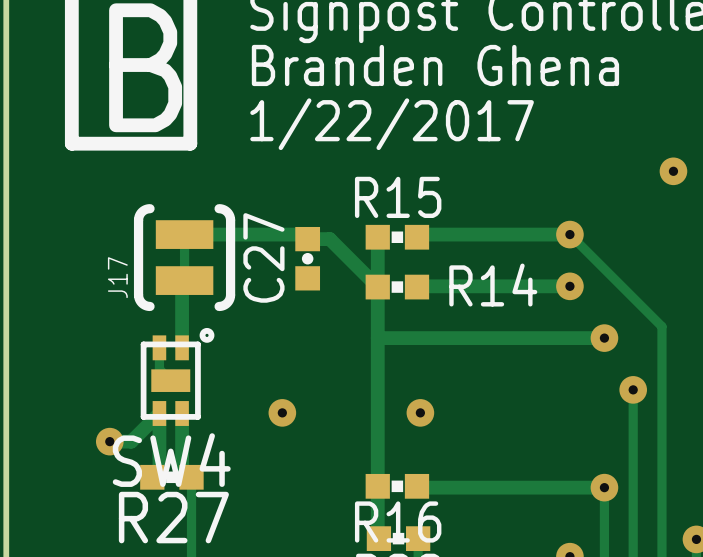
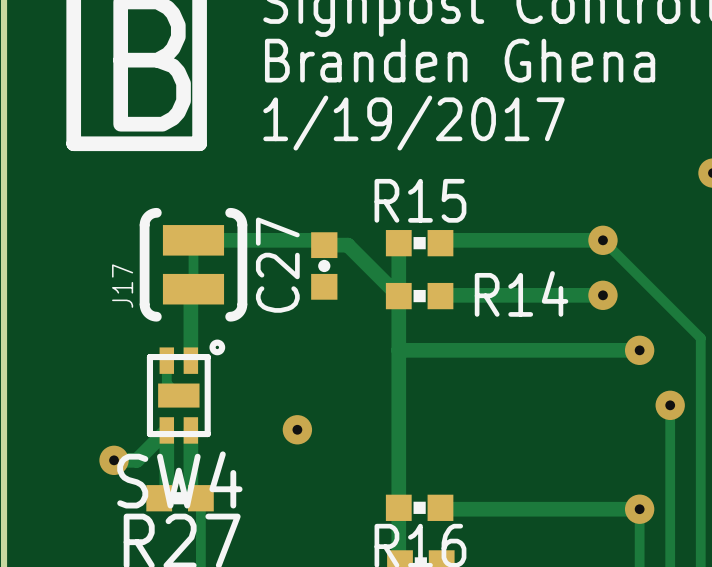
text: 1/22/2017 (392, 124) -> 1/19/2017 (413, 123)
via: (420, 412) -> none

